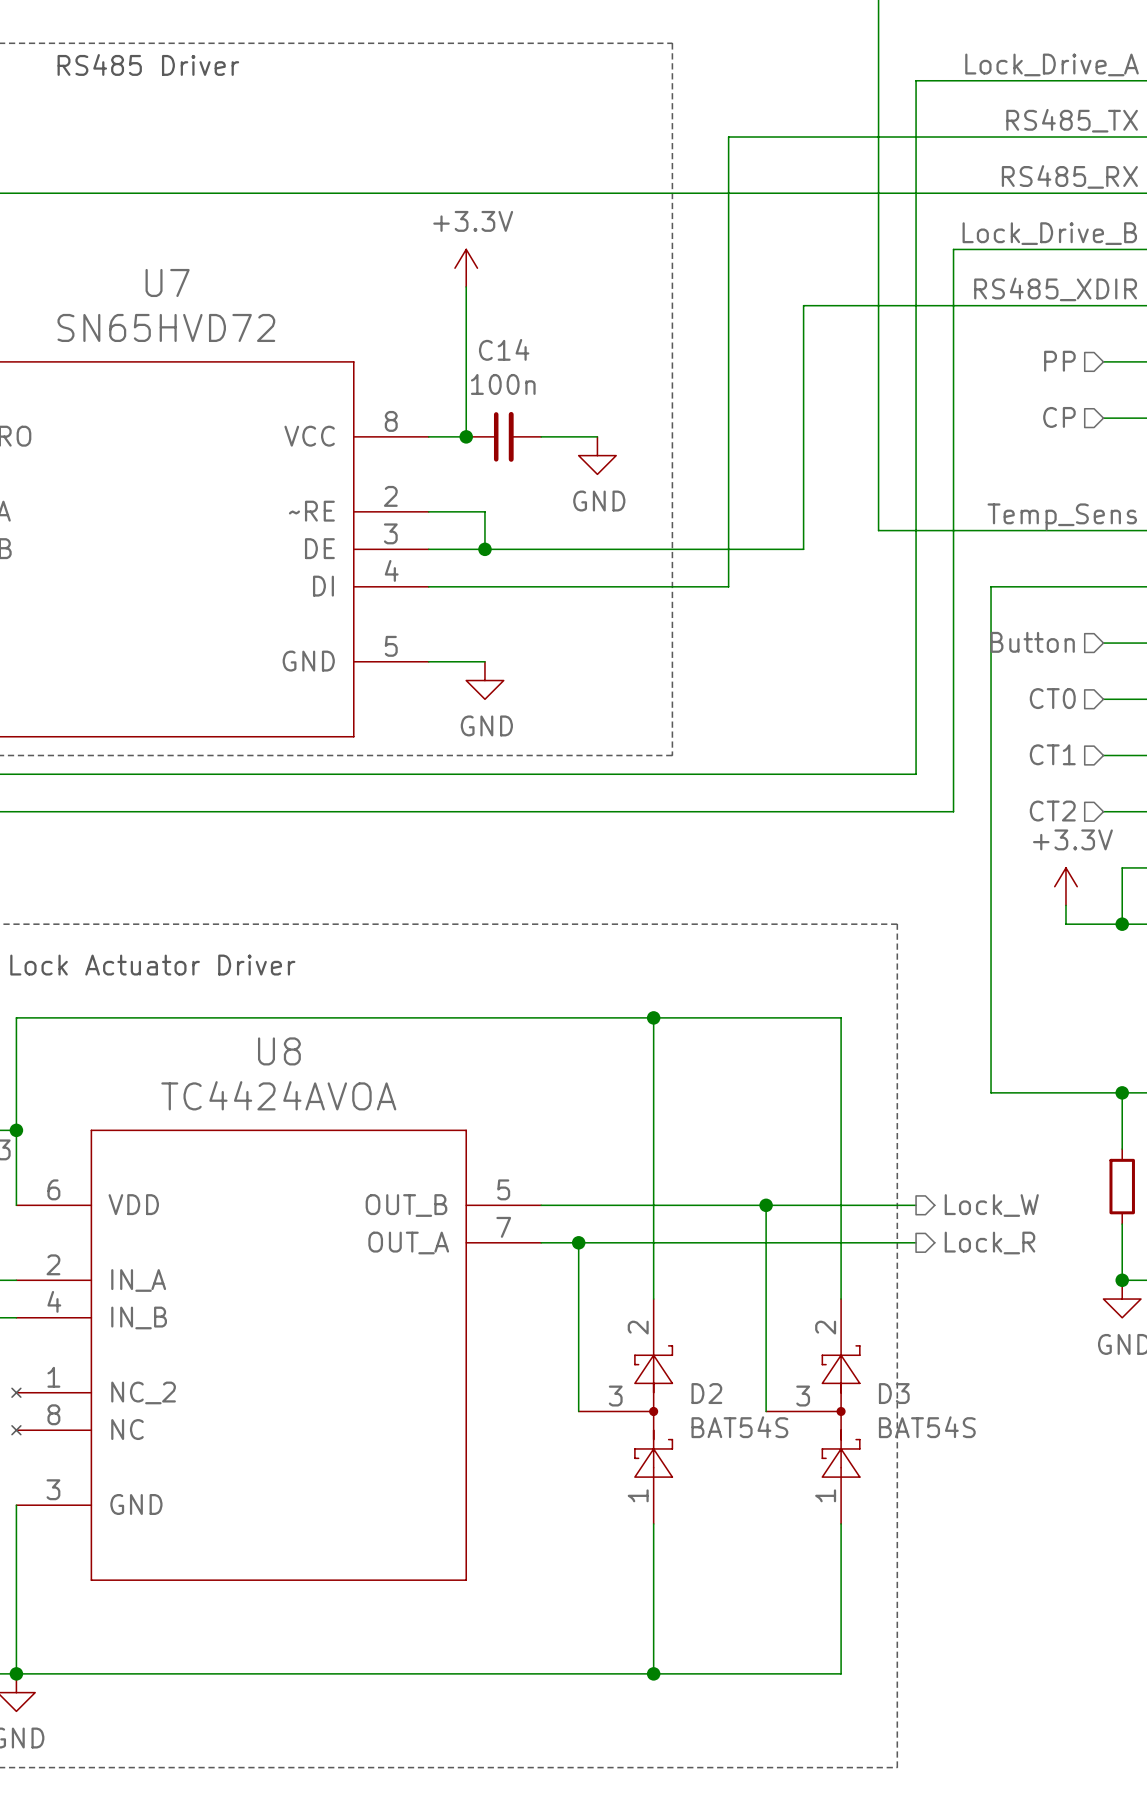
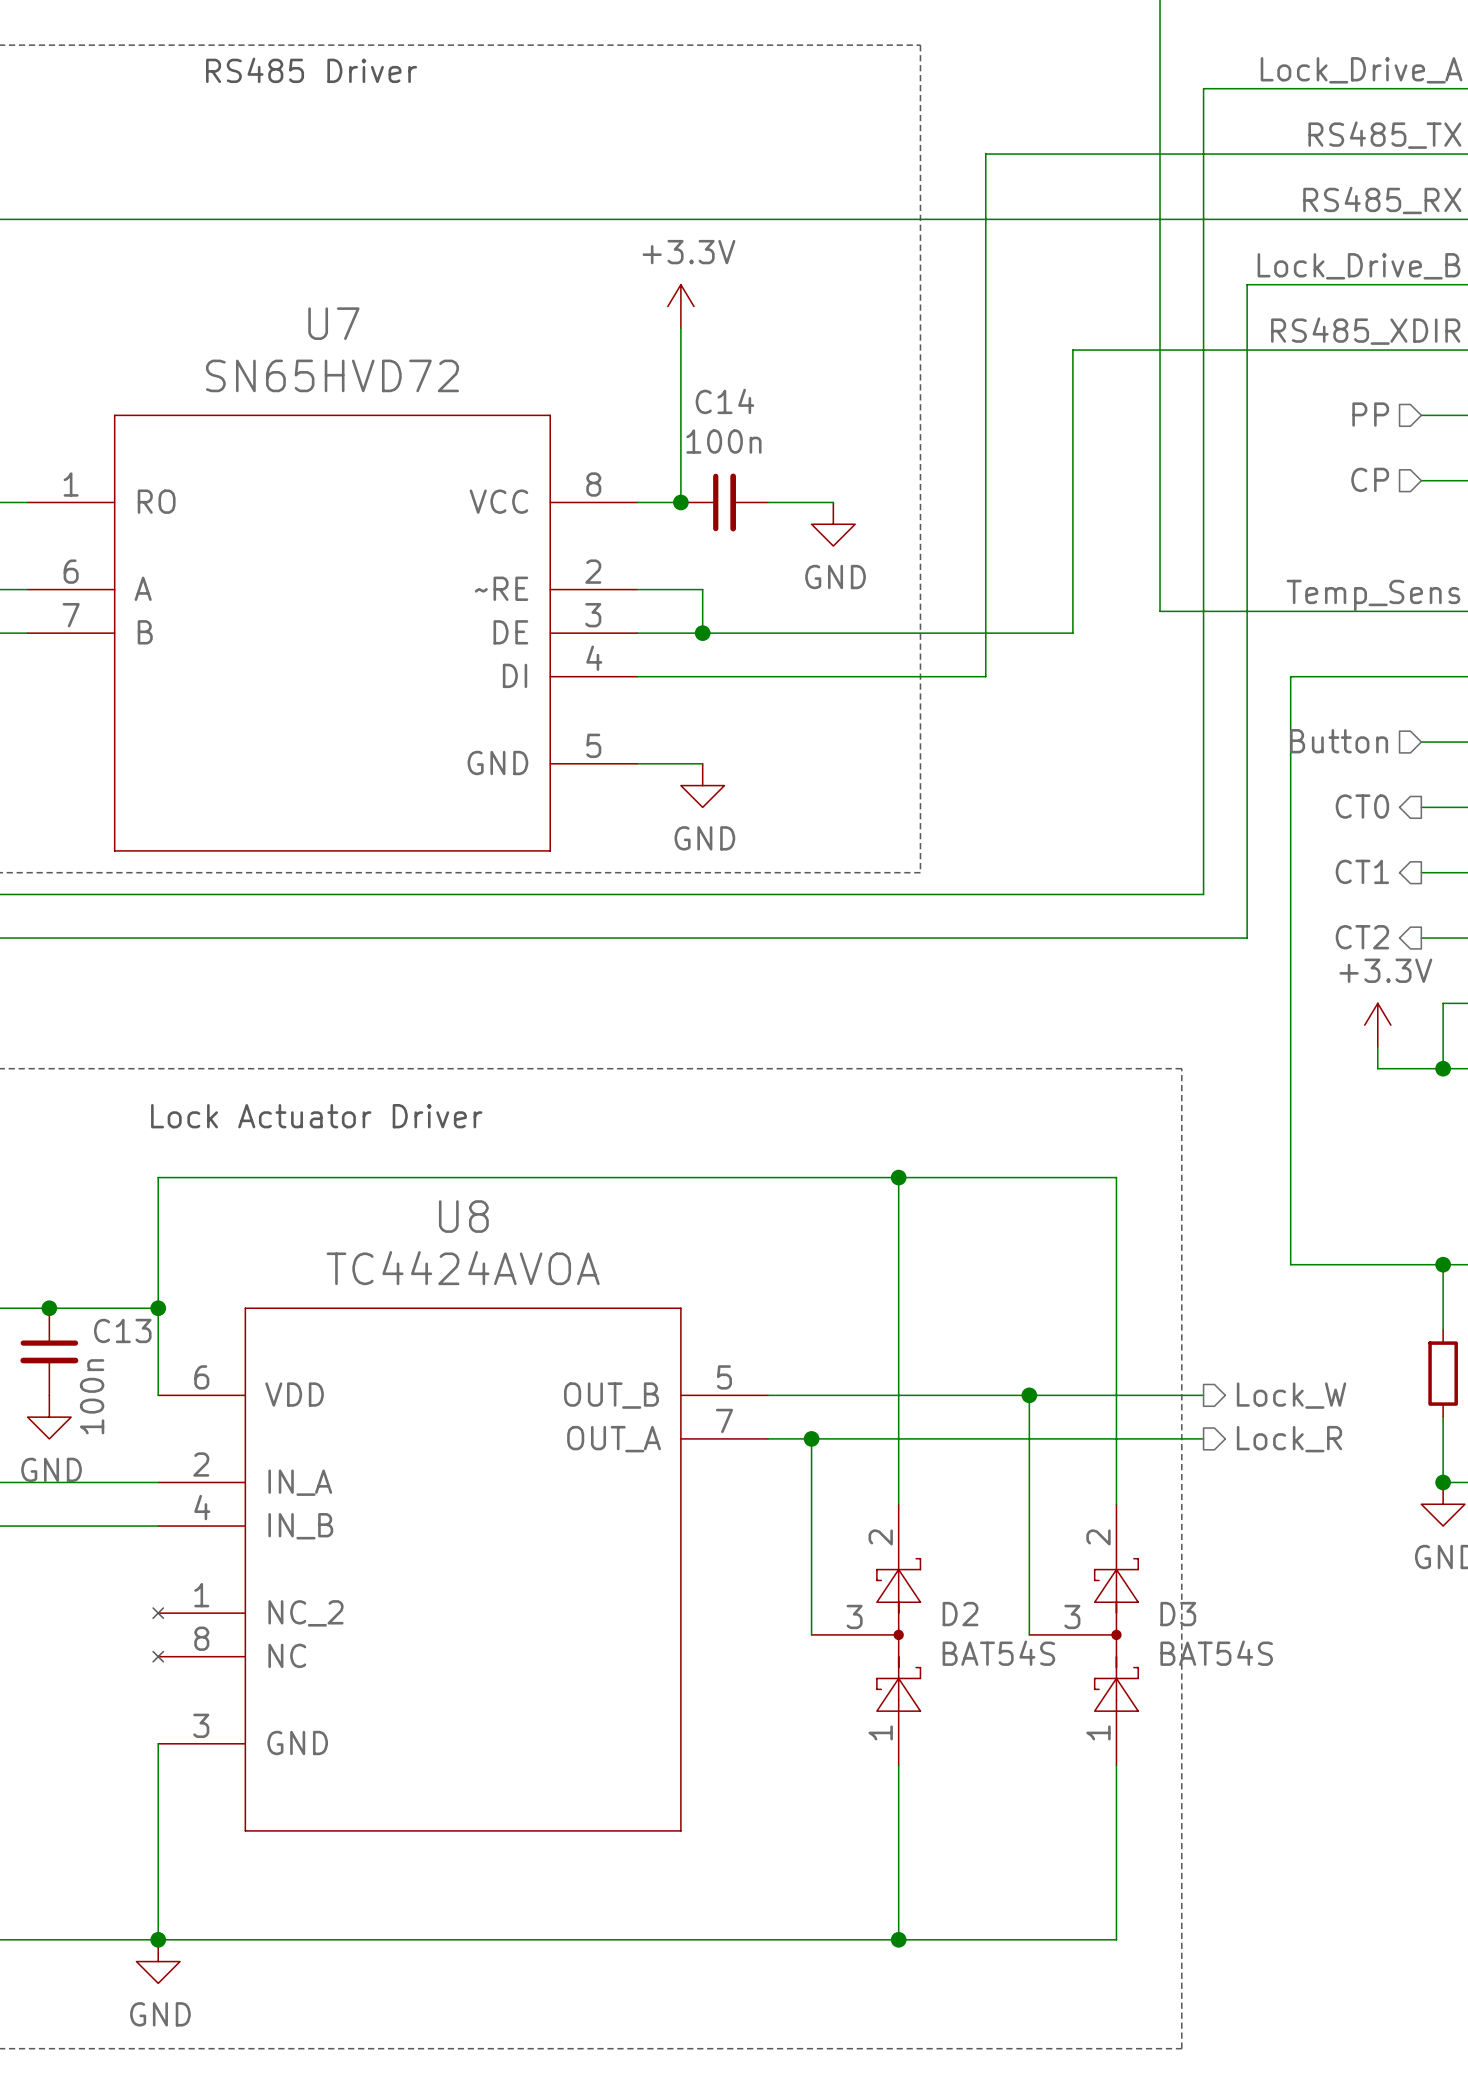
hierarchical label shape: input (1052, 698) -> output (1362, 806)
hierarchical label shape: input (1052, 754) -> output (1362, 871)
hierarchical label shape: input (1052, 811) -> output (1362, 937)

